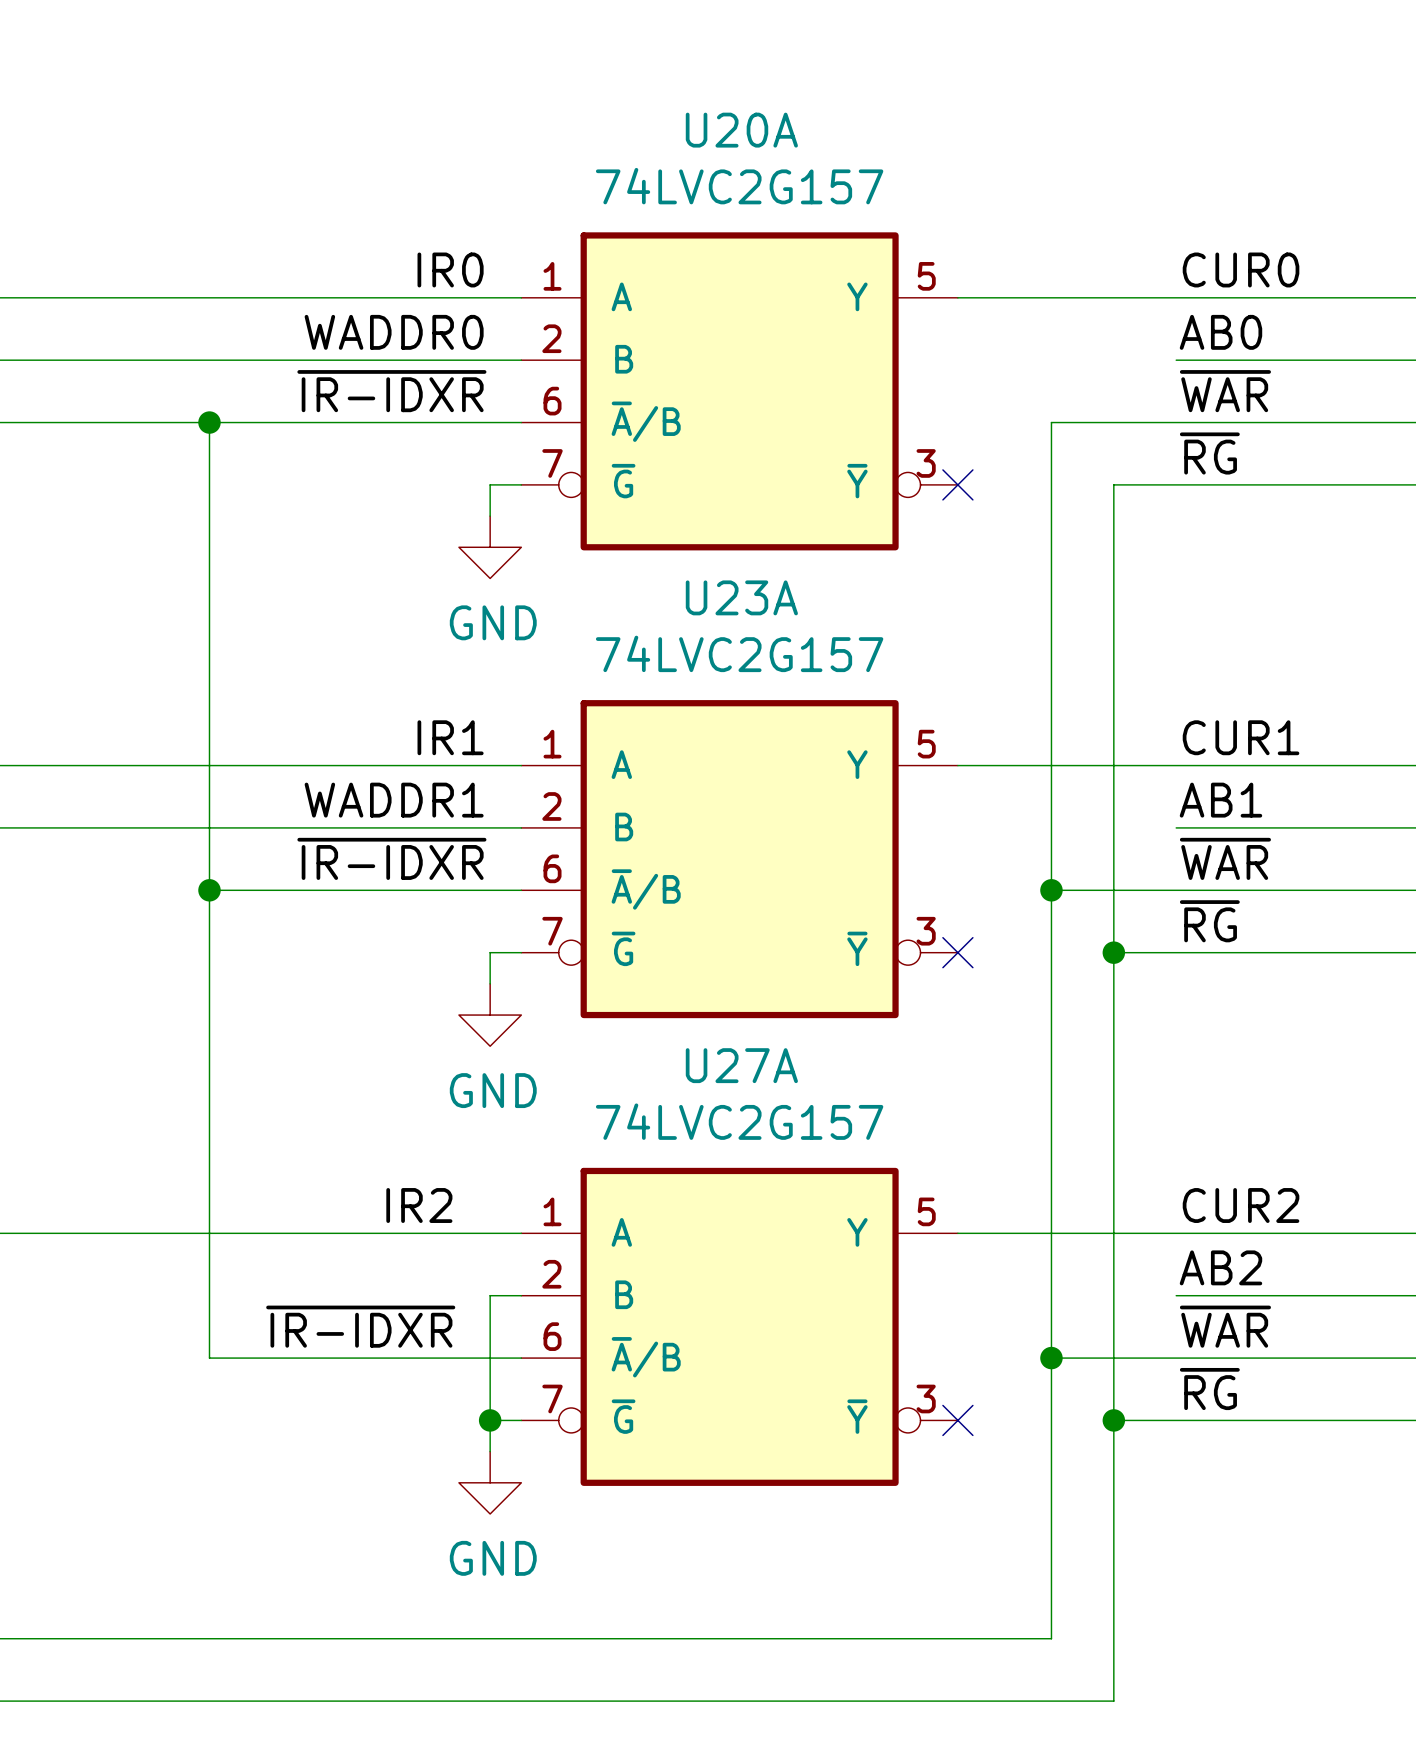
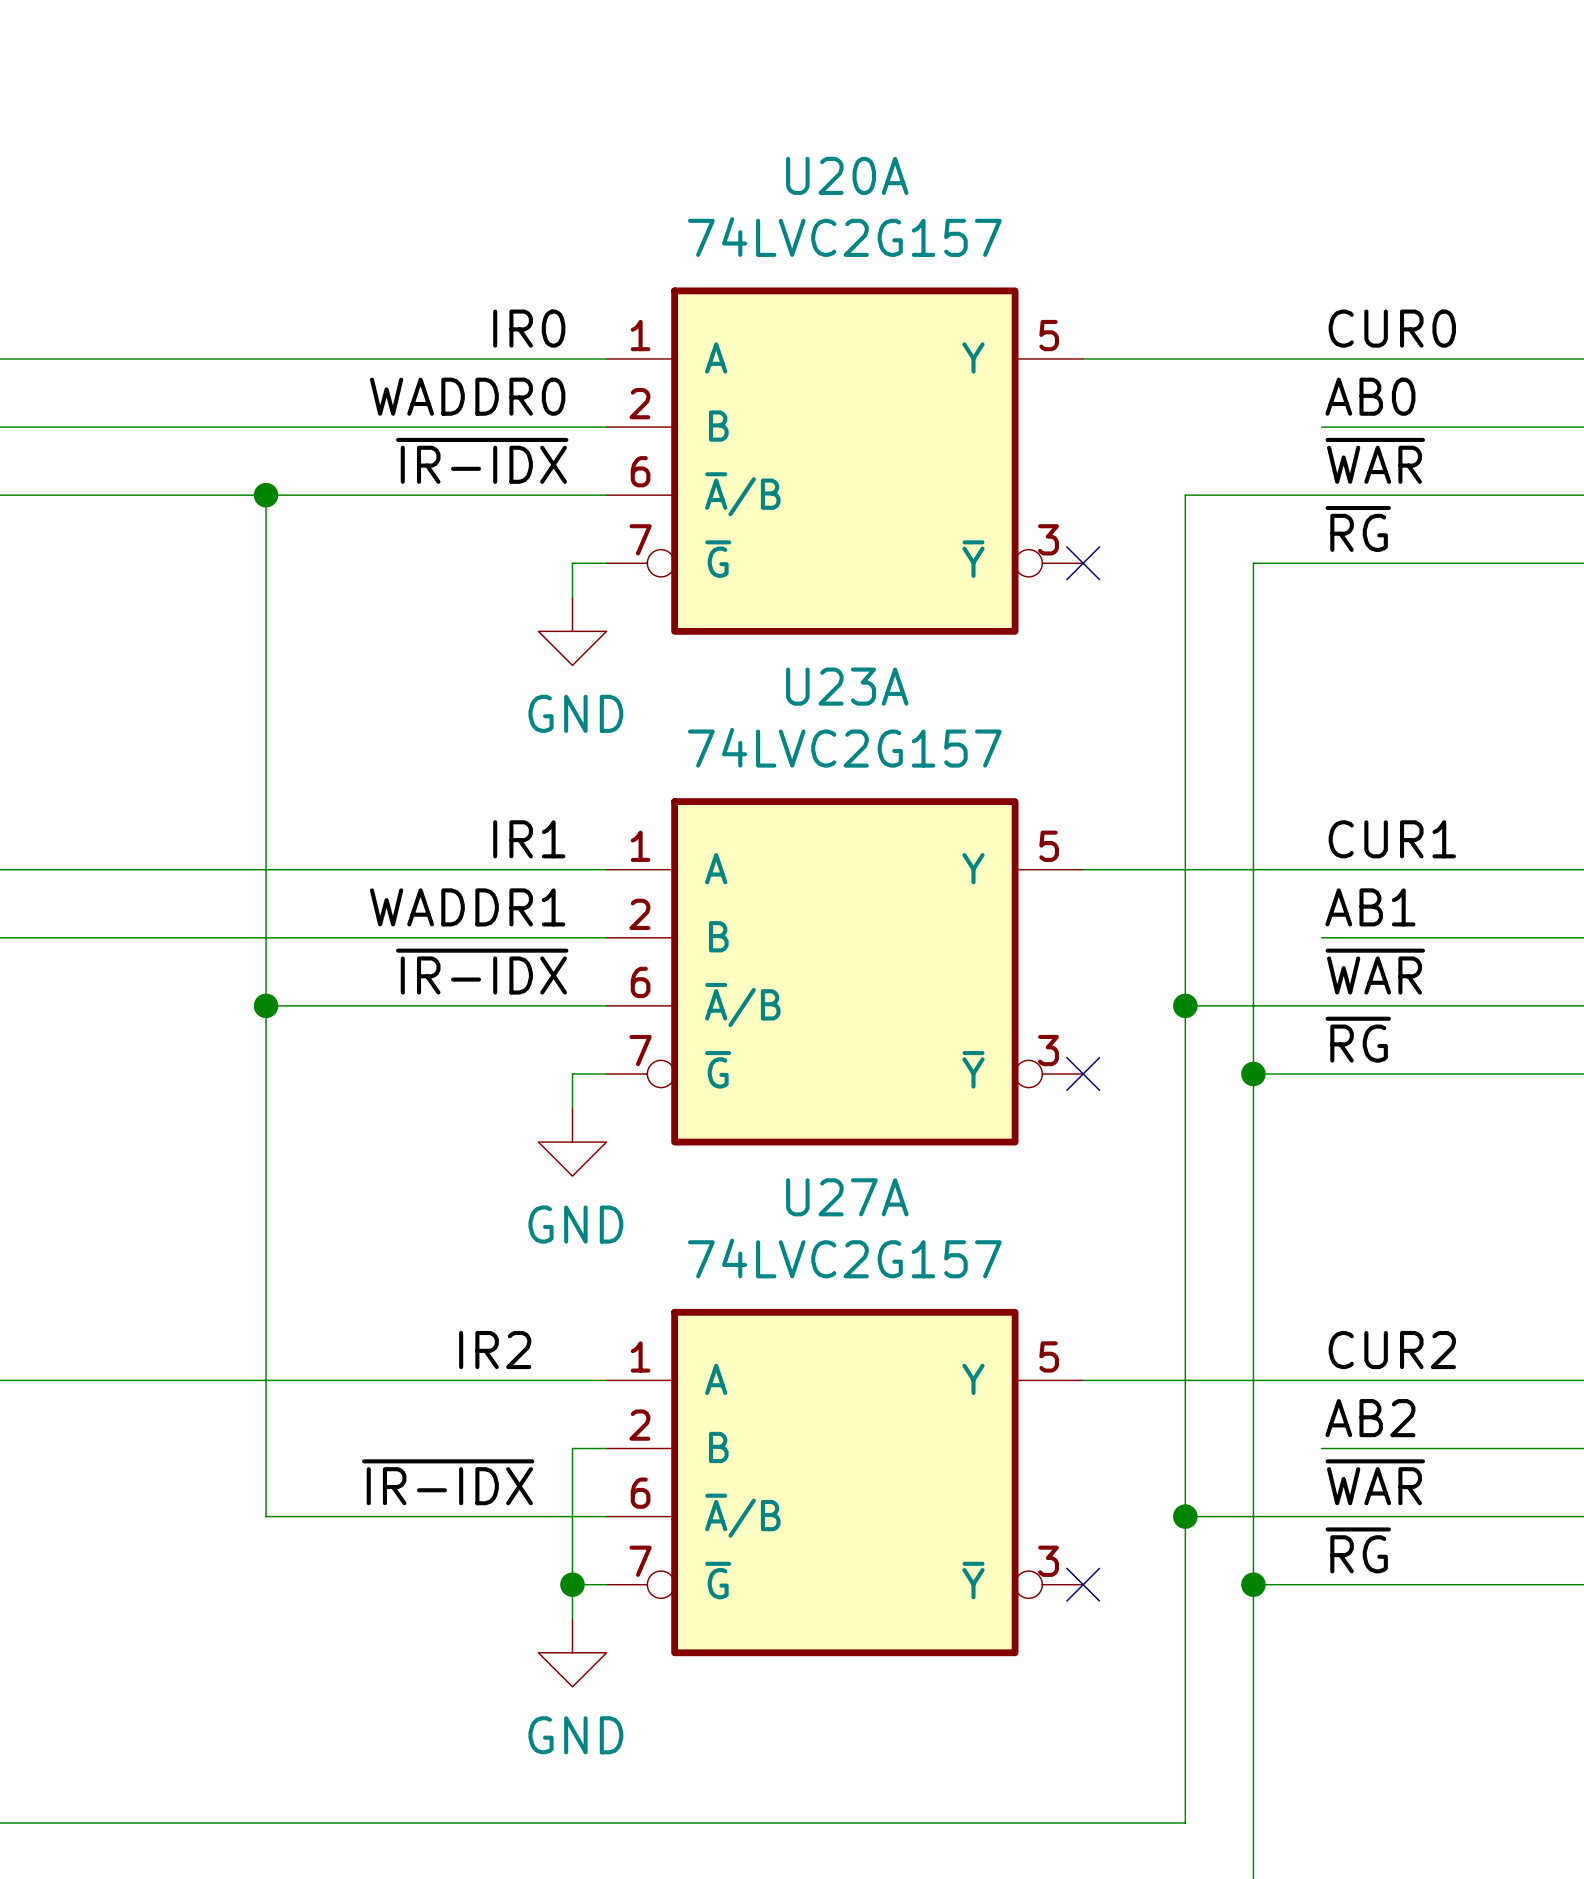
label: ~{IR-IDXR} (391, 391) -> ~{IR-IDX} (482, 460)
label: ~{IR-IDXR} (391, 858) -> ~{IR-IDX} (482, 971)
label: ~{IR-IDXR} (360, 1326) -> ~{IR-IDX} (448, 1482)

